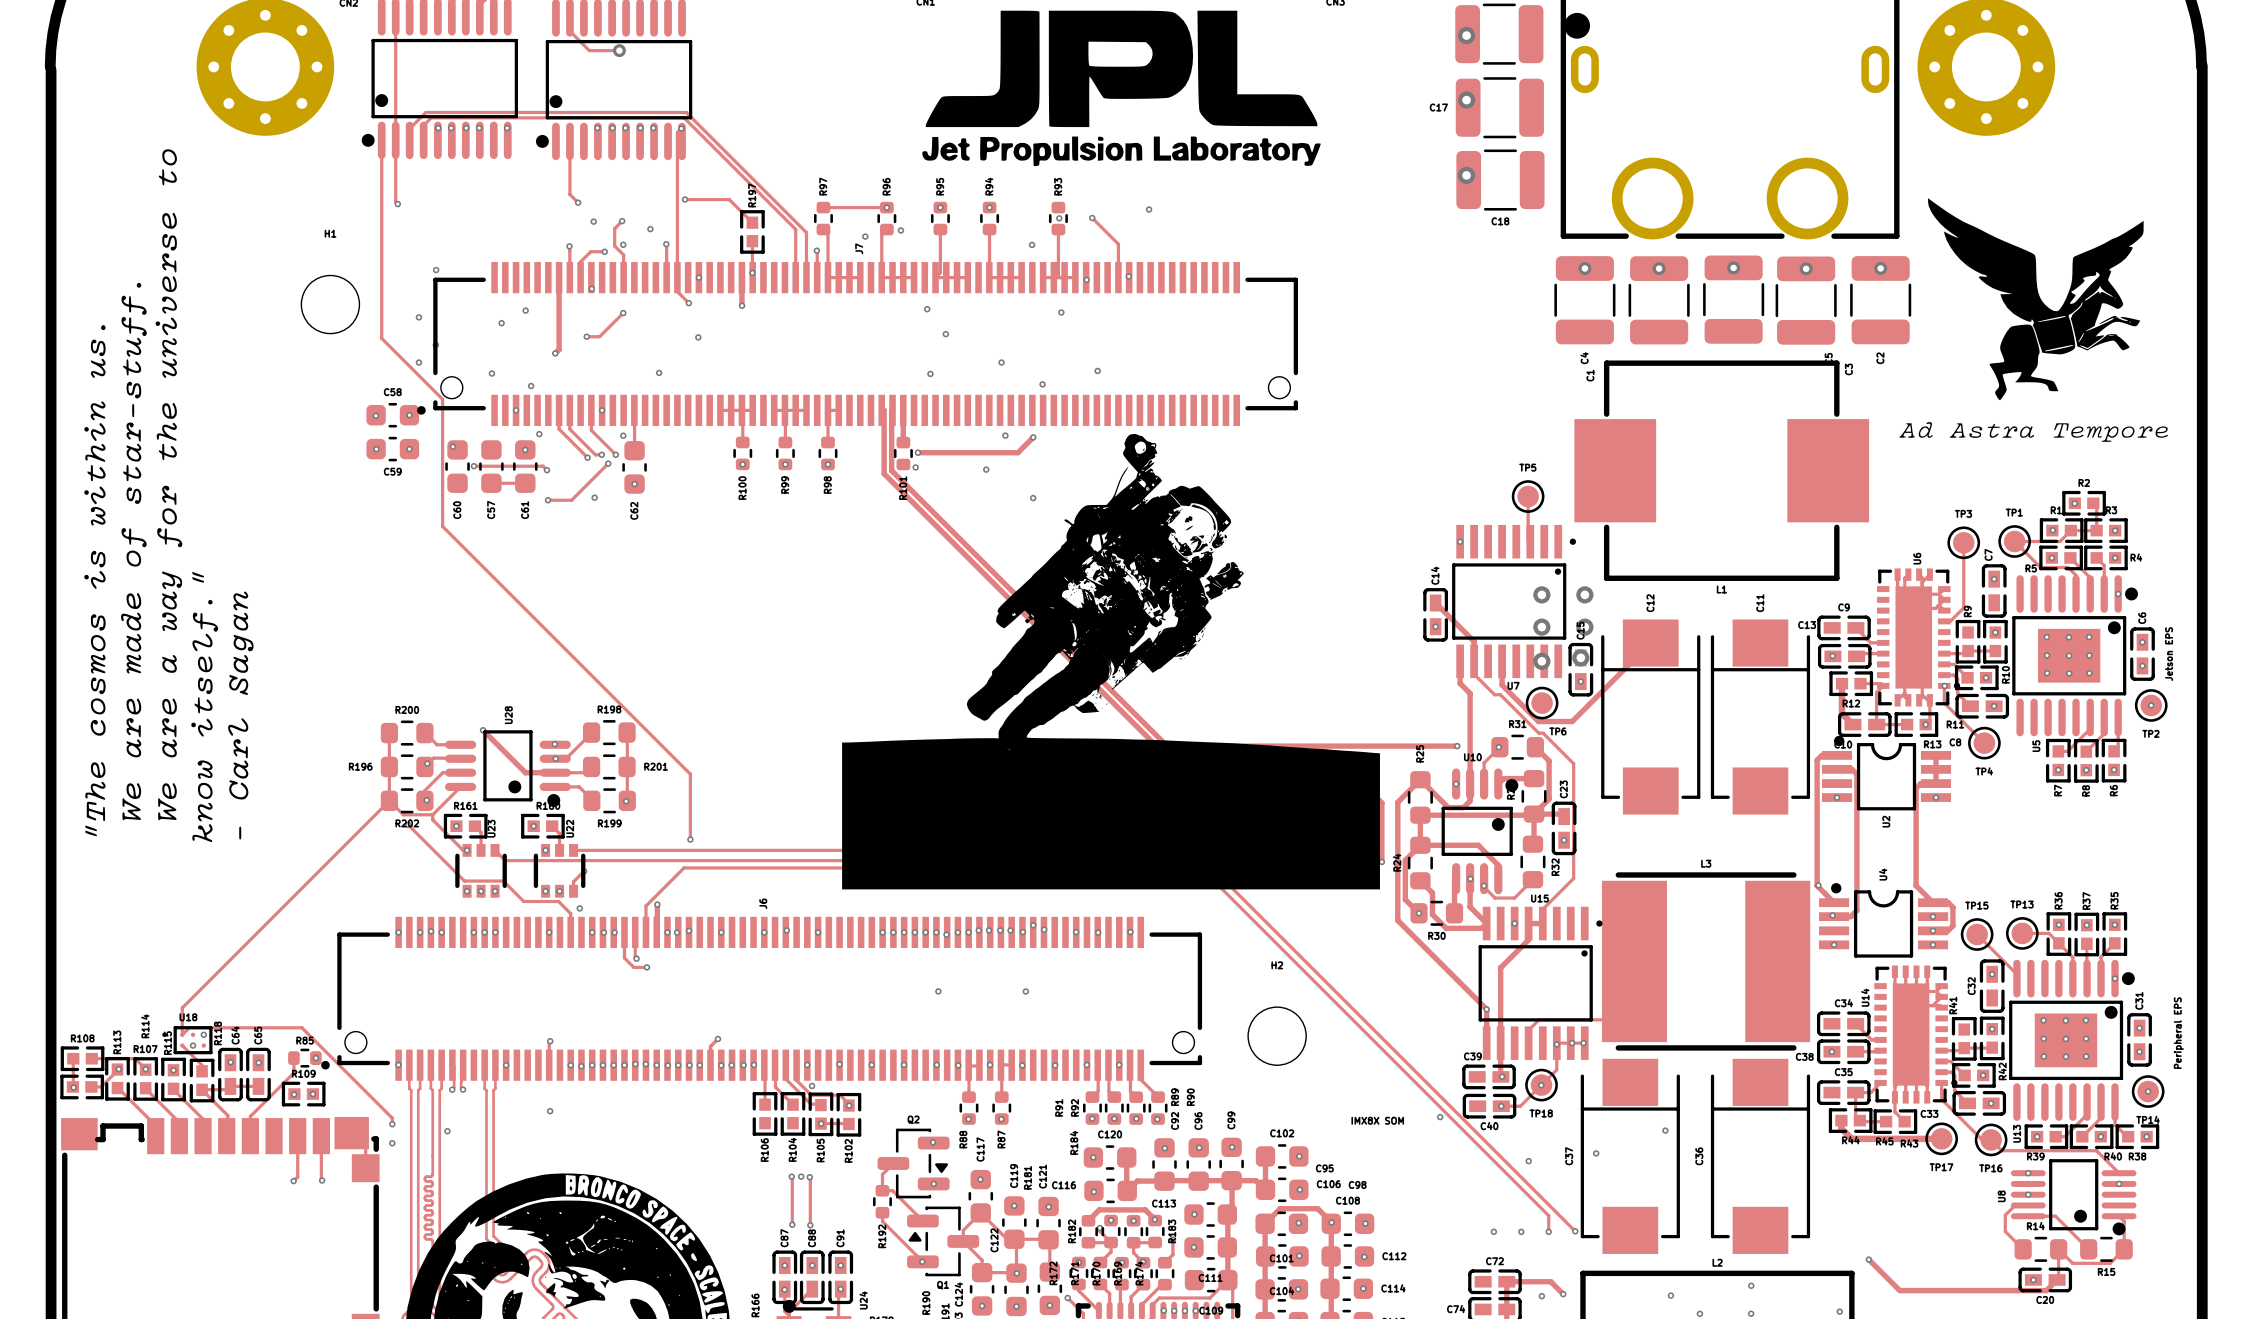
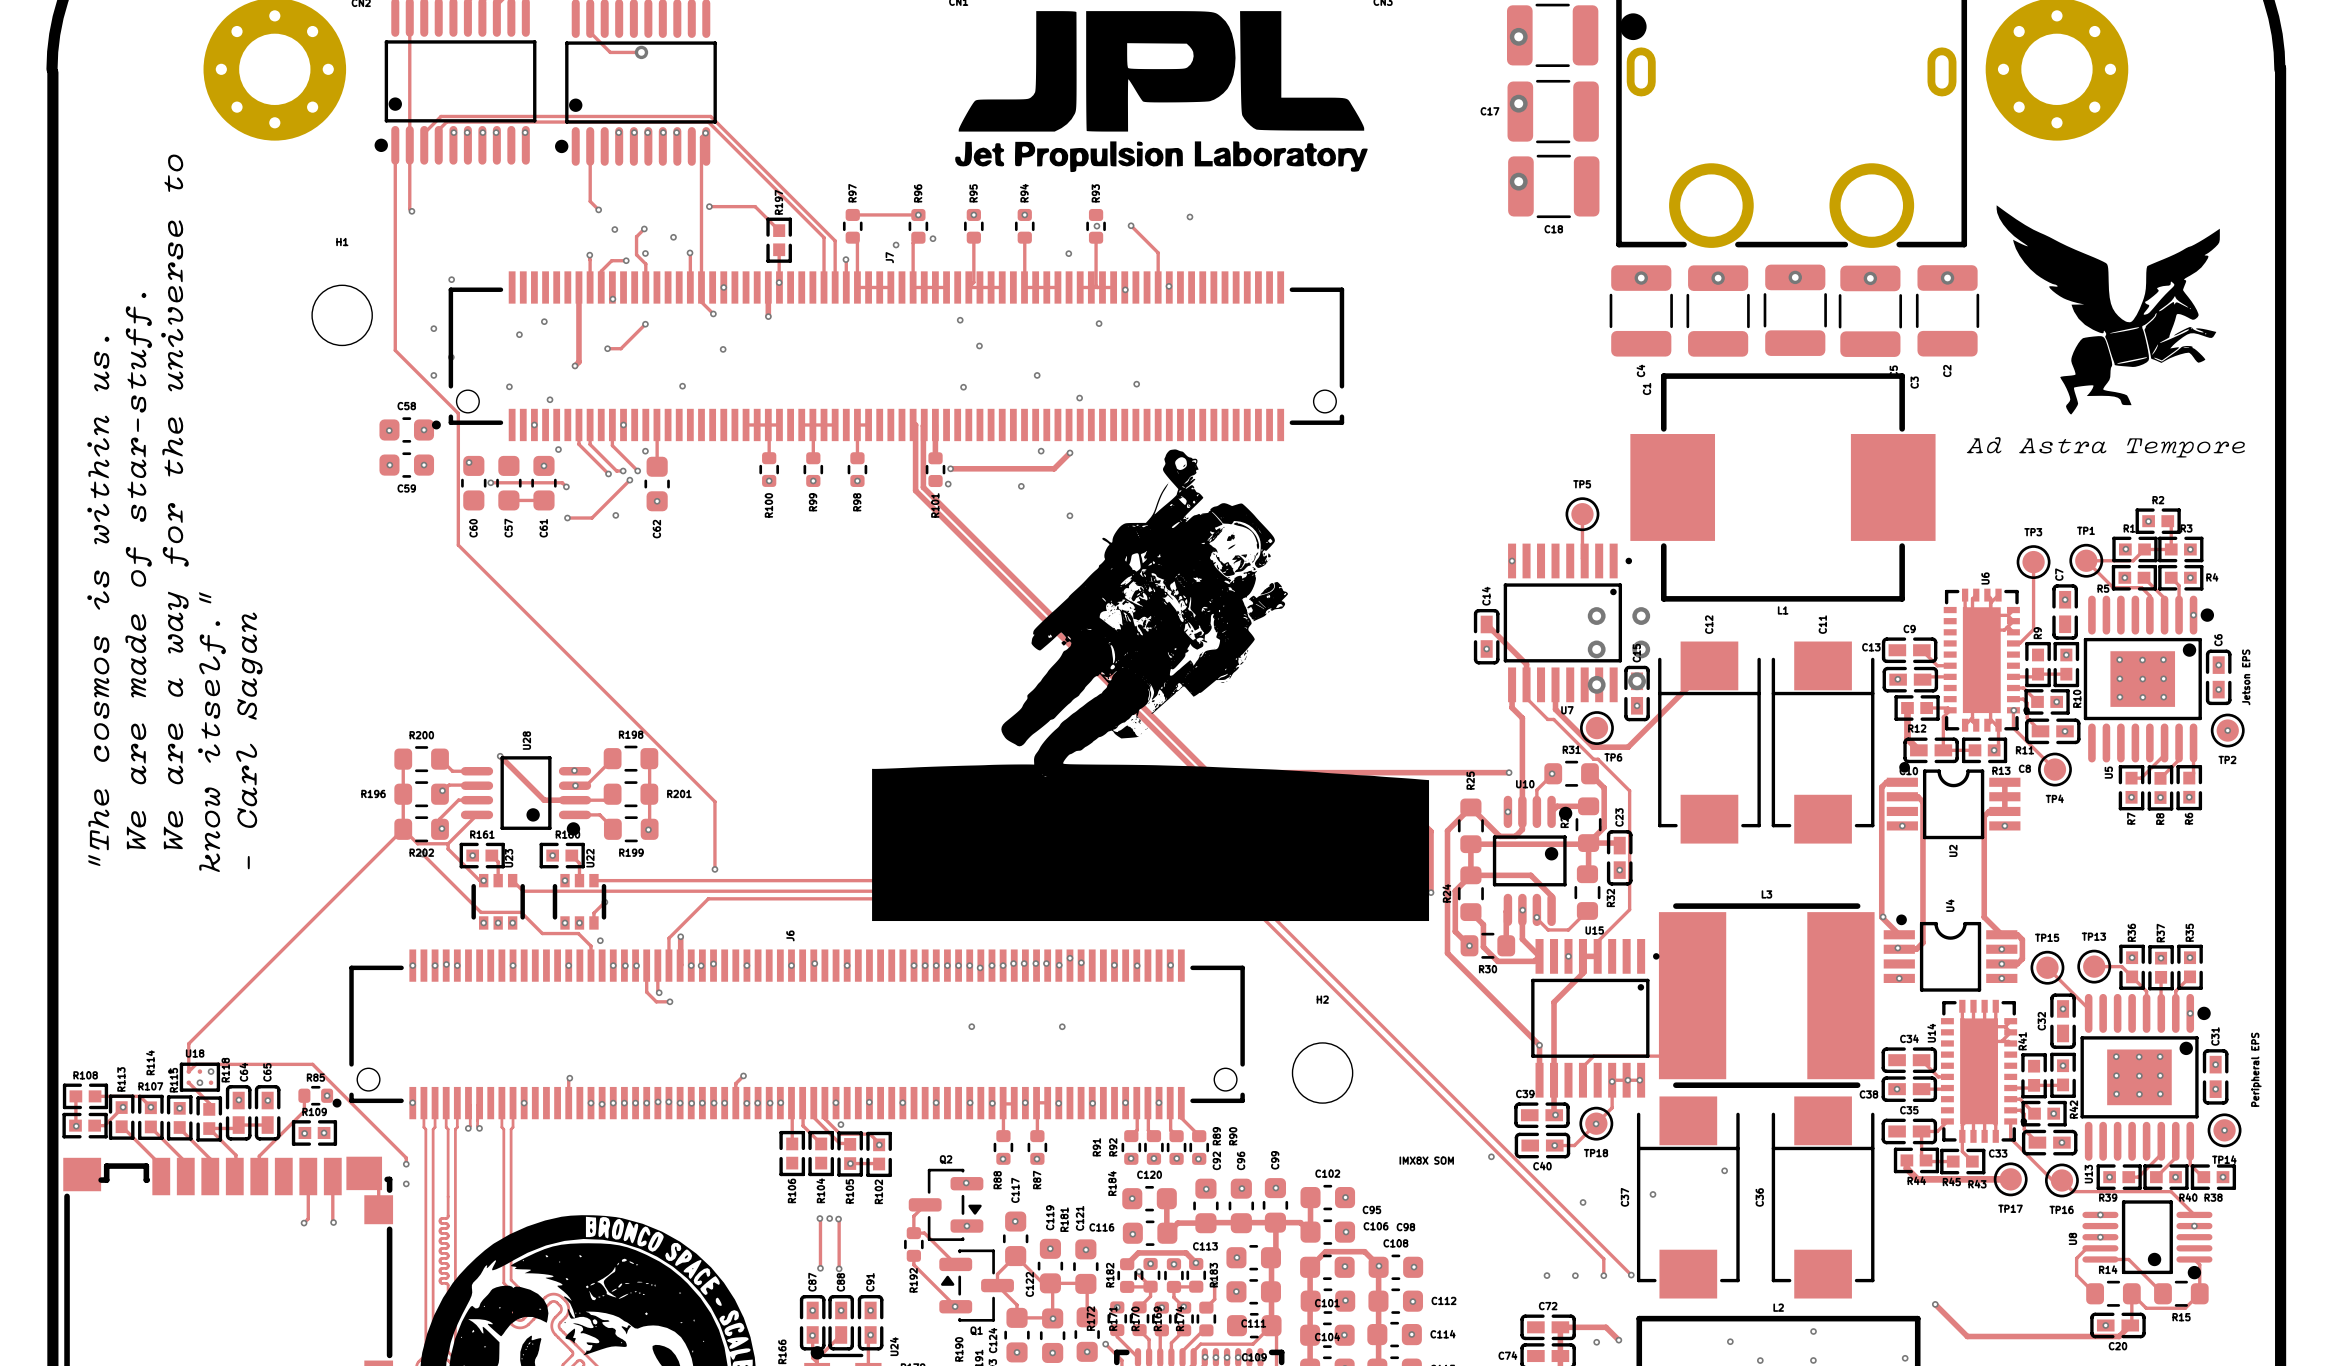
via: (473, 932) -> none
via: (484, 932) -> none
via: (550, 1111) -> none
via: (447, 1131) -> none

